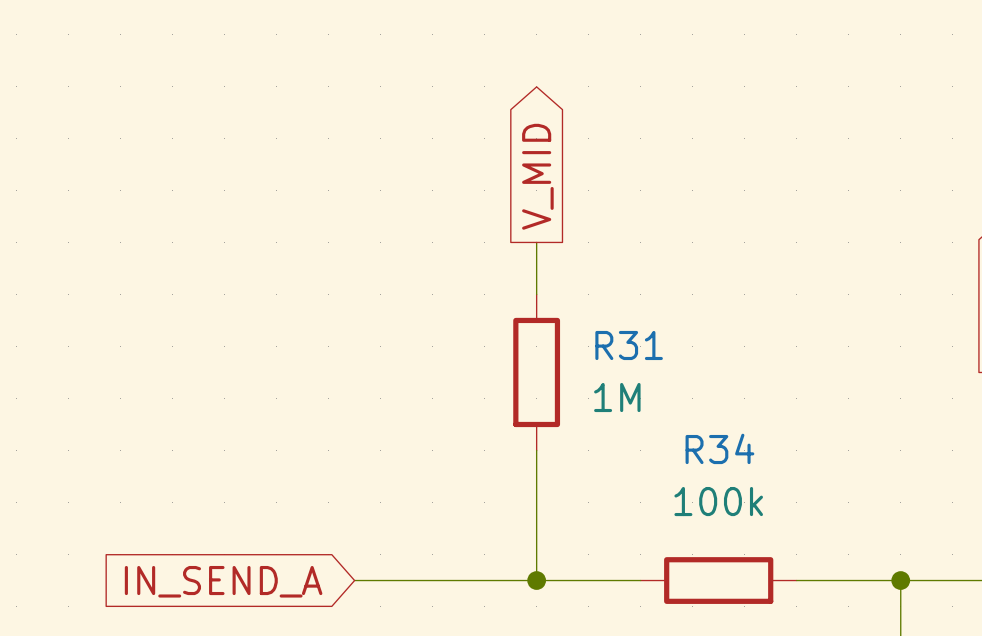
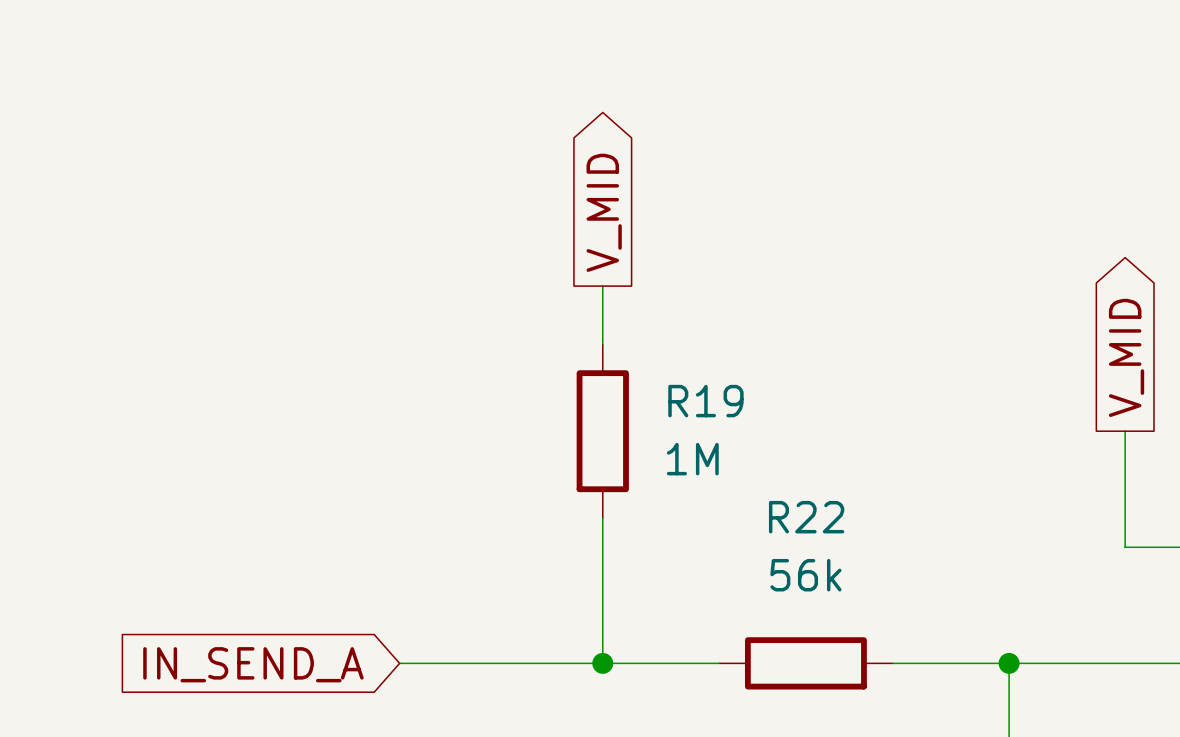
R31 name: R31 (629, 345) -> R19 (705, 401)
R34 name: R34 (719, 448) -> R22 (806, 517)
R34 value: 100k (718, 501) -> 56k (805, 575)

